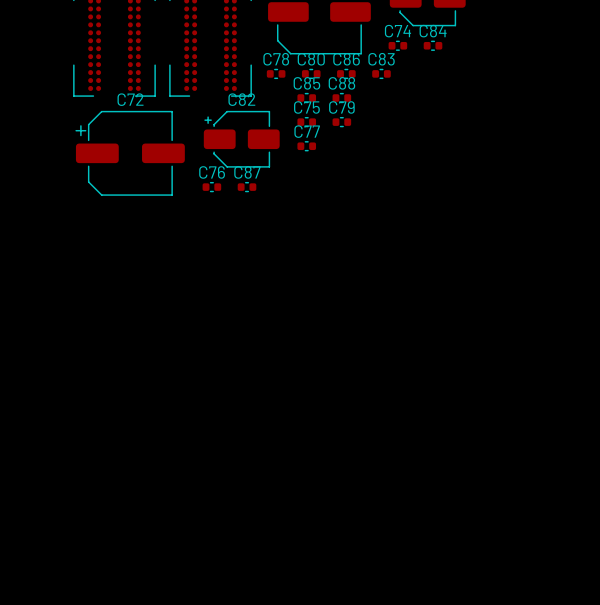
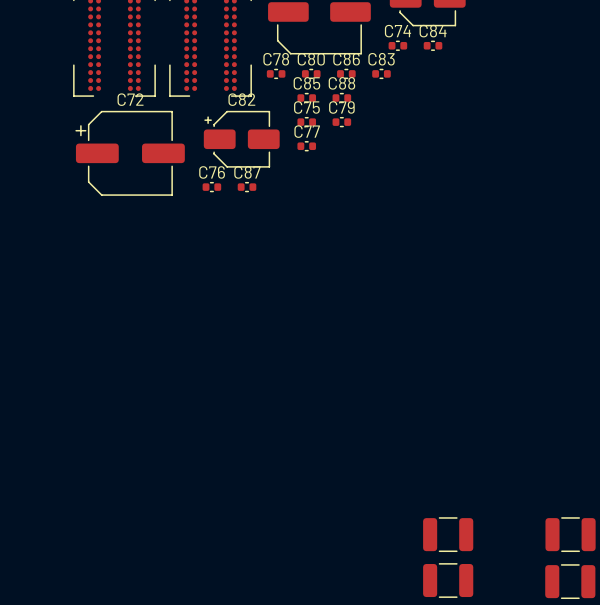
part: none -> (448, 534)
part: none -> (570, 534)
part: none -> (448, 580)
part: none -> (570, 581)

